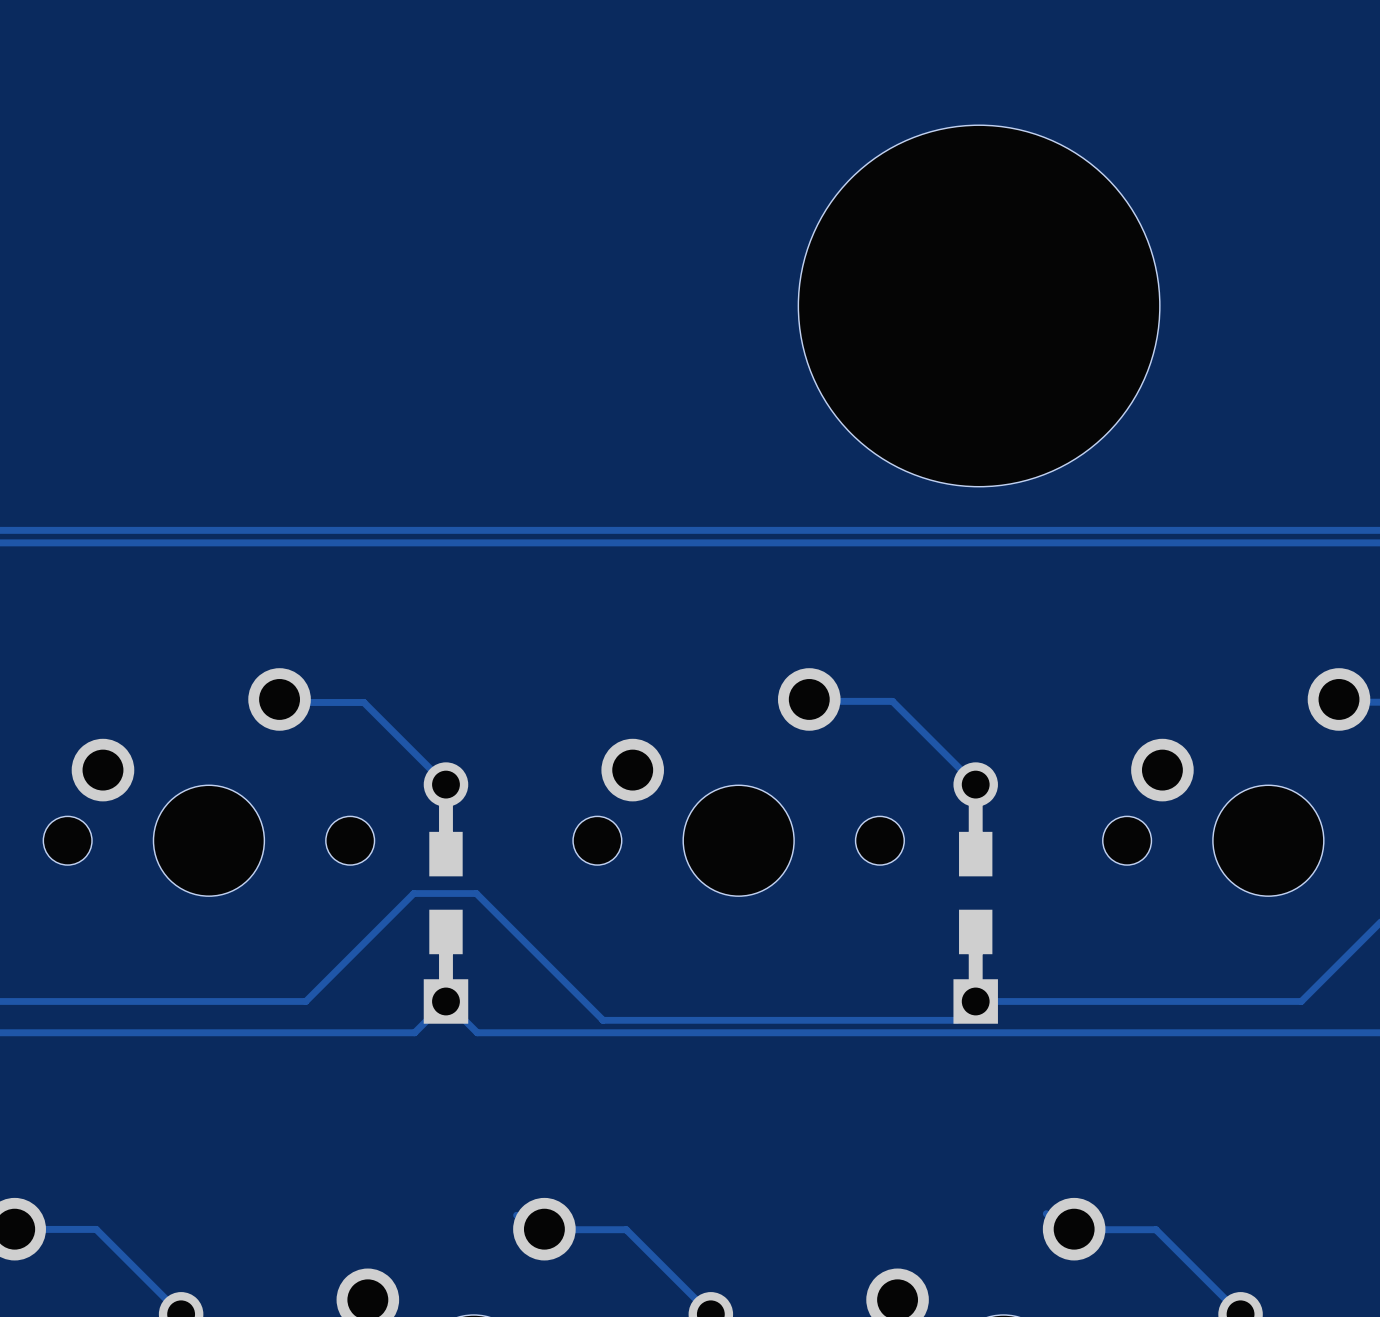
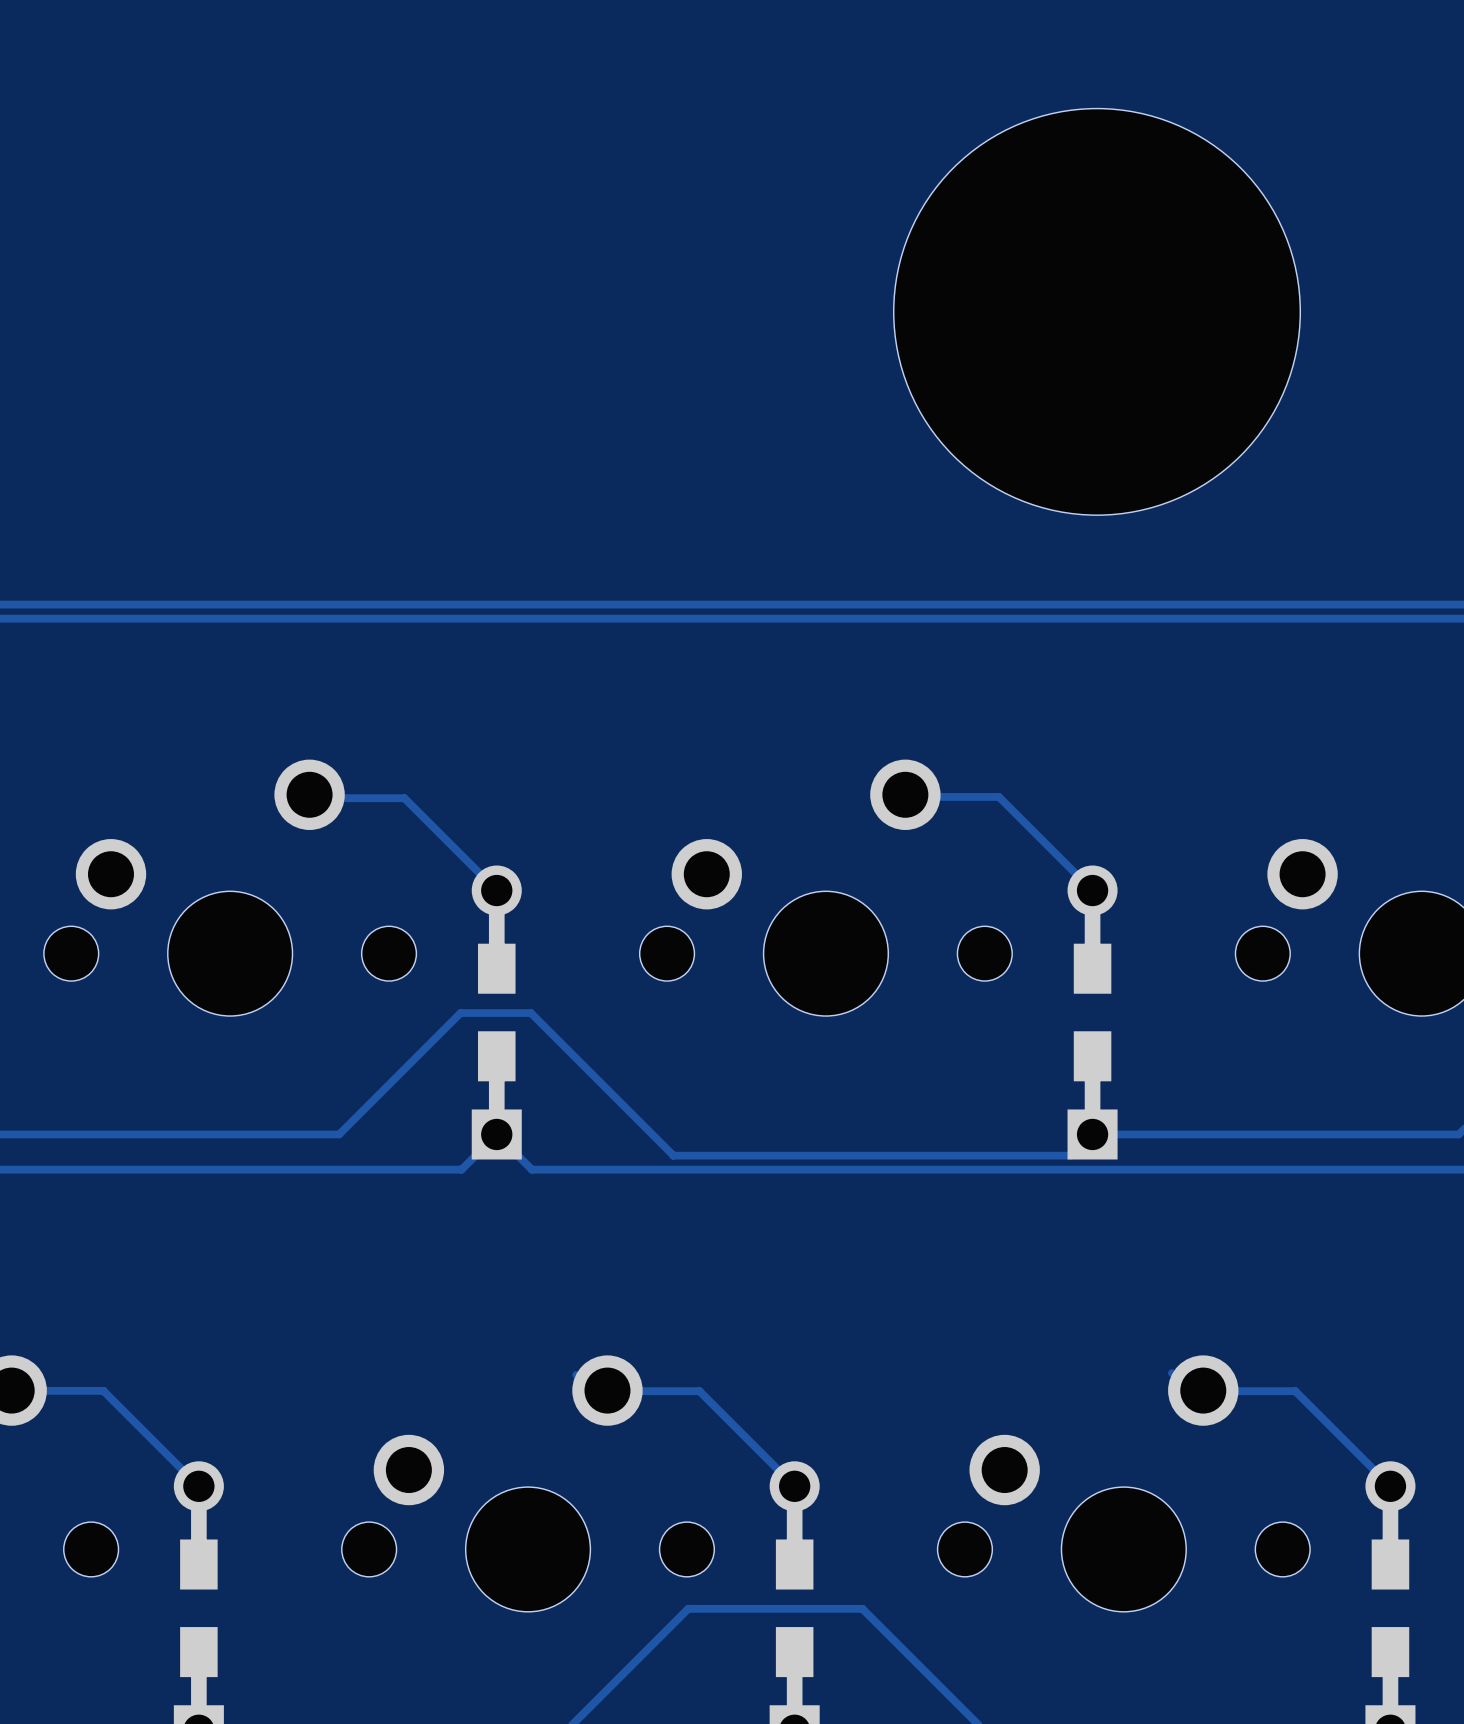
part position: (979, 305) -> (1097, 311)

